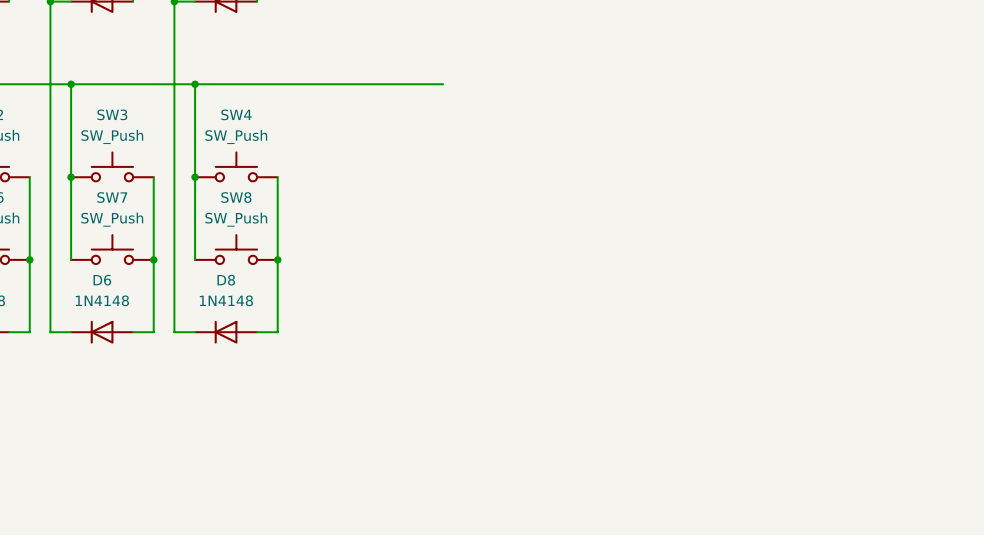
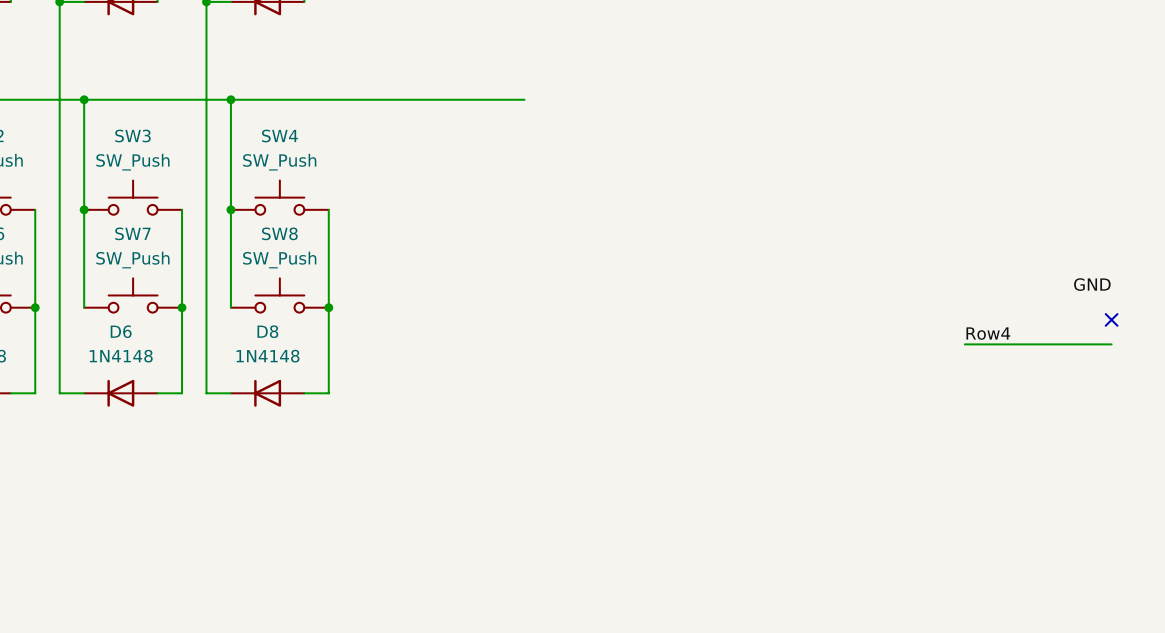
label: none -> GND (1092, 284)
no-connect mark: none -> (1111, 319)
label: none -> Row4 (988, 333)
wire: none -> (964, 344) (1111, 344)

